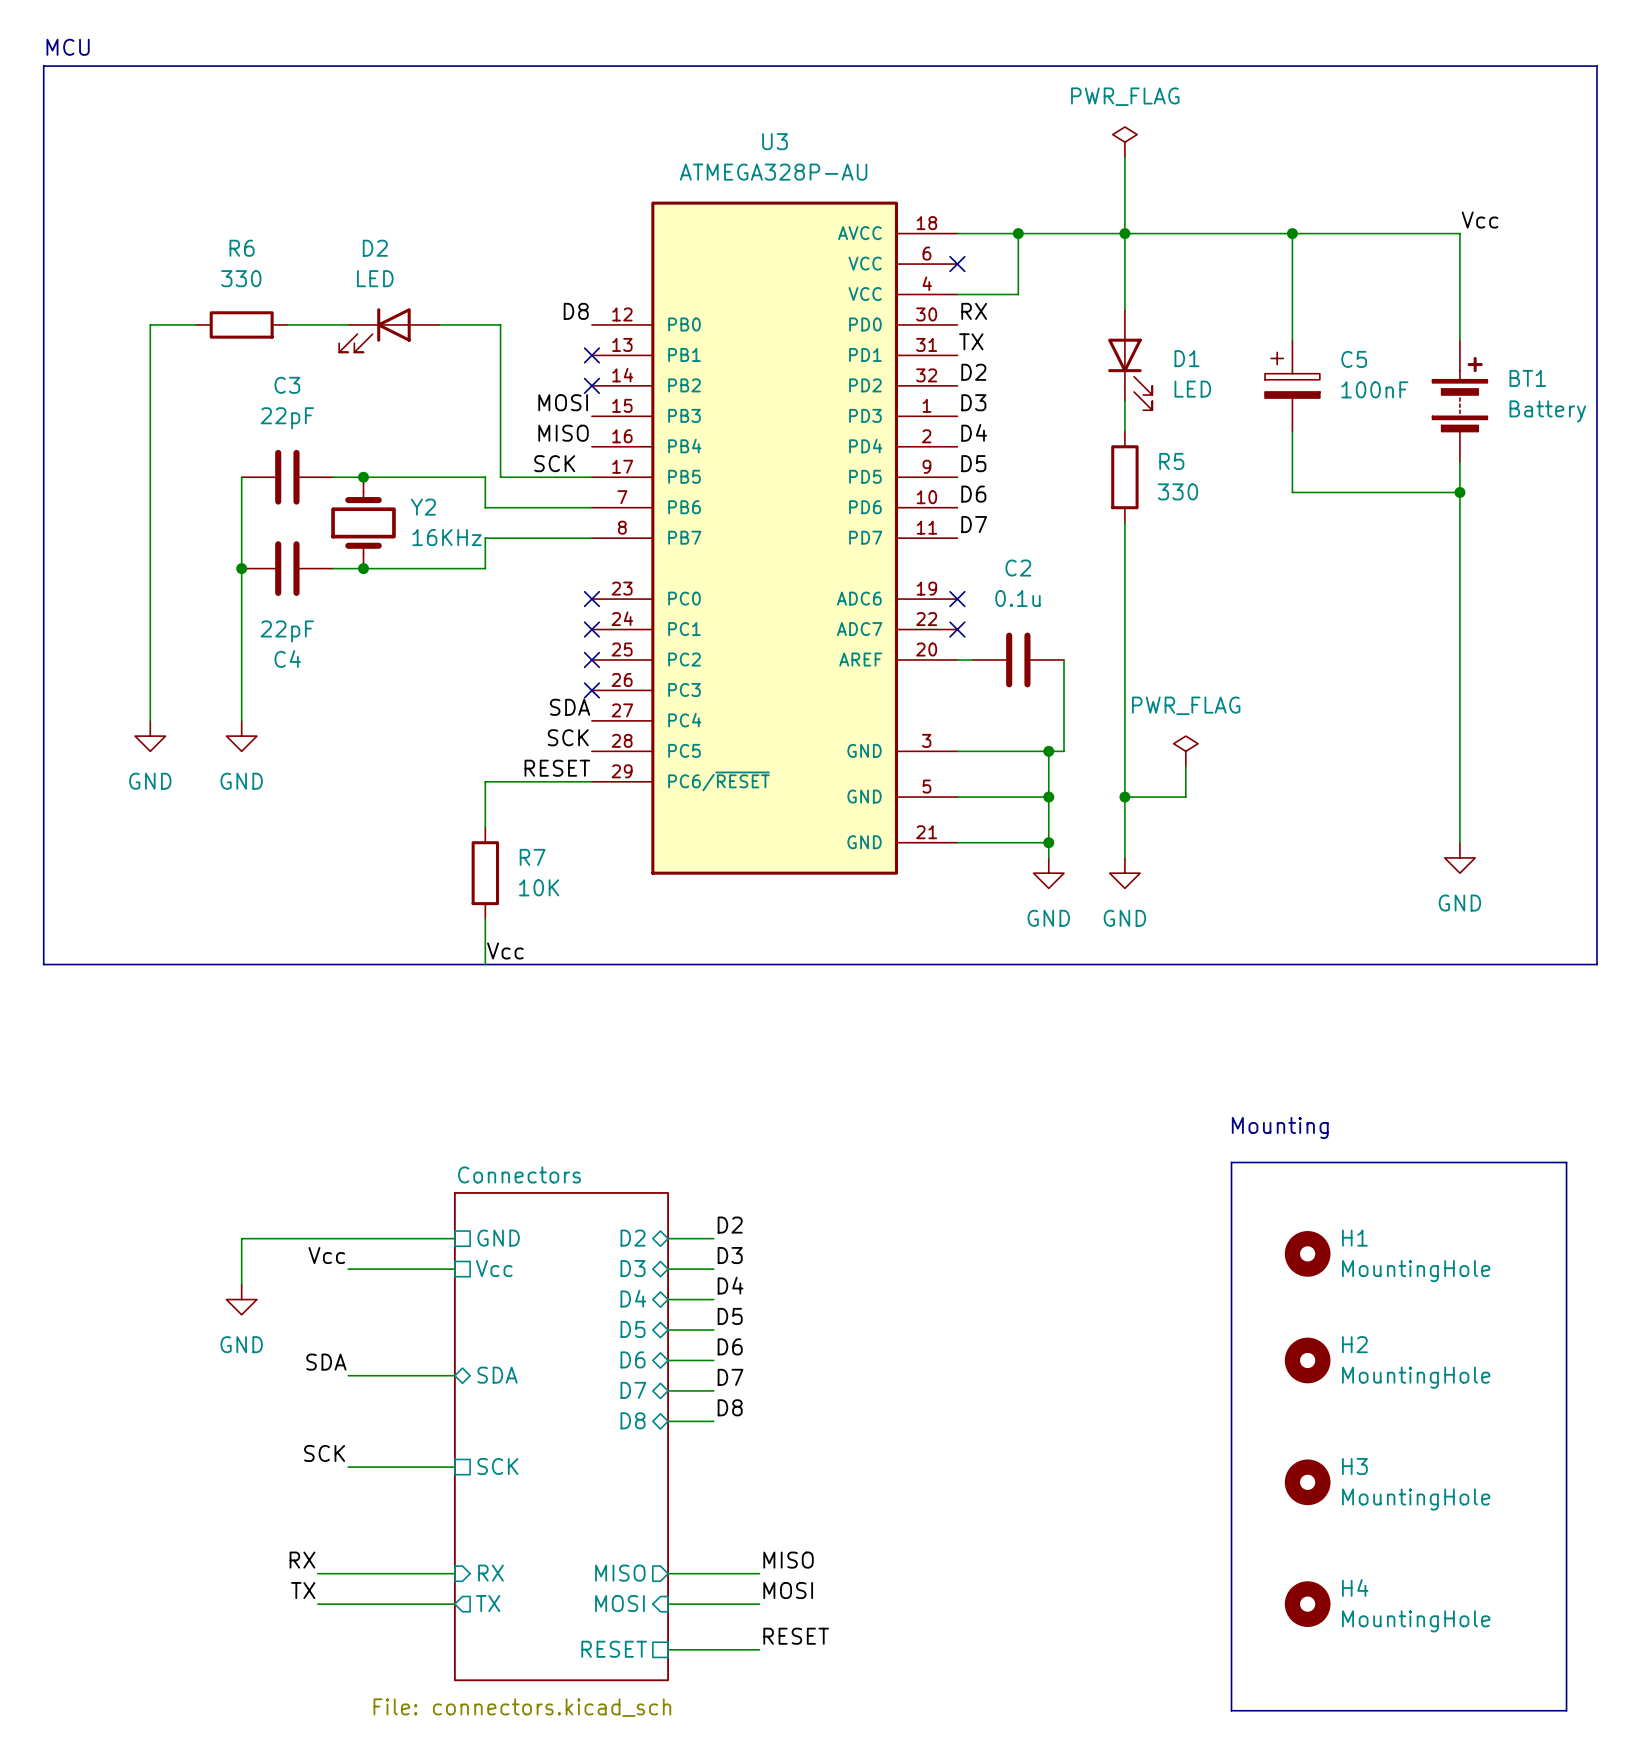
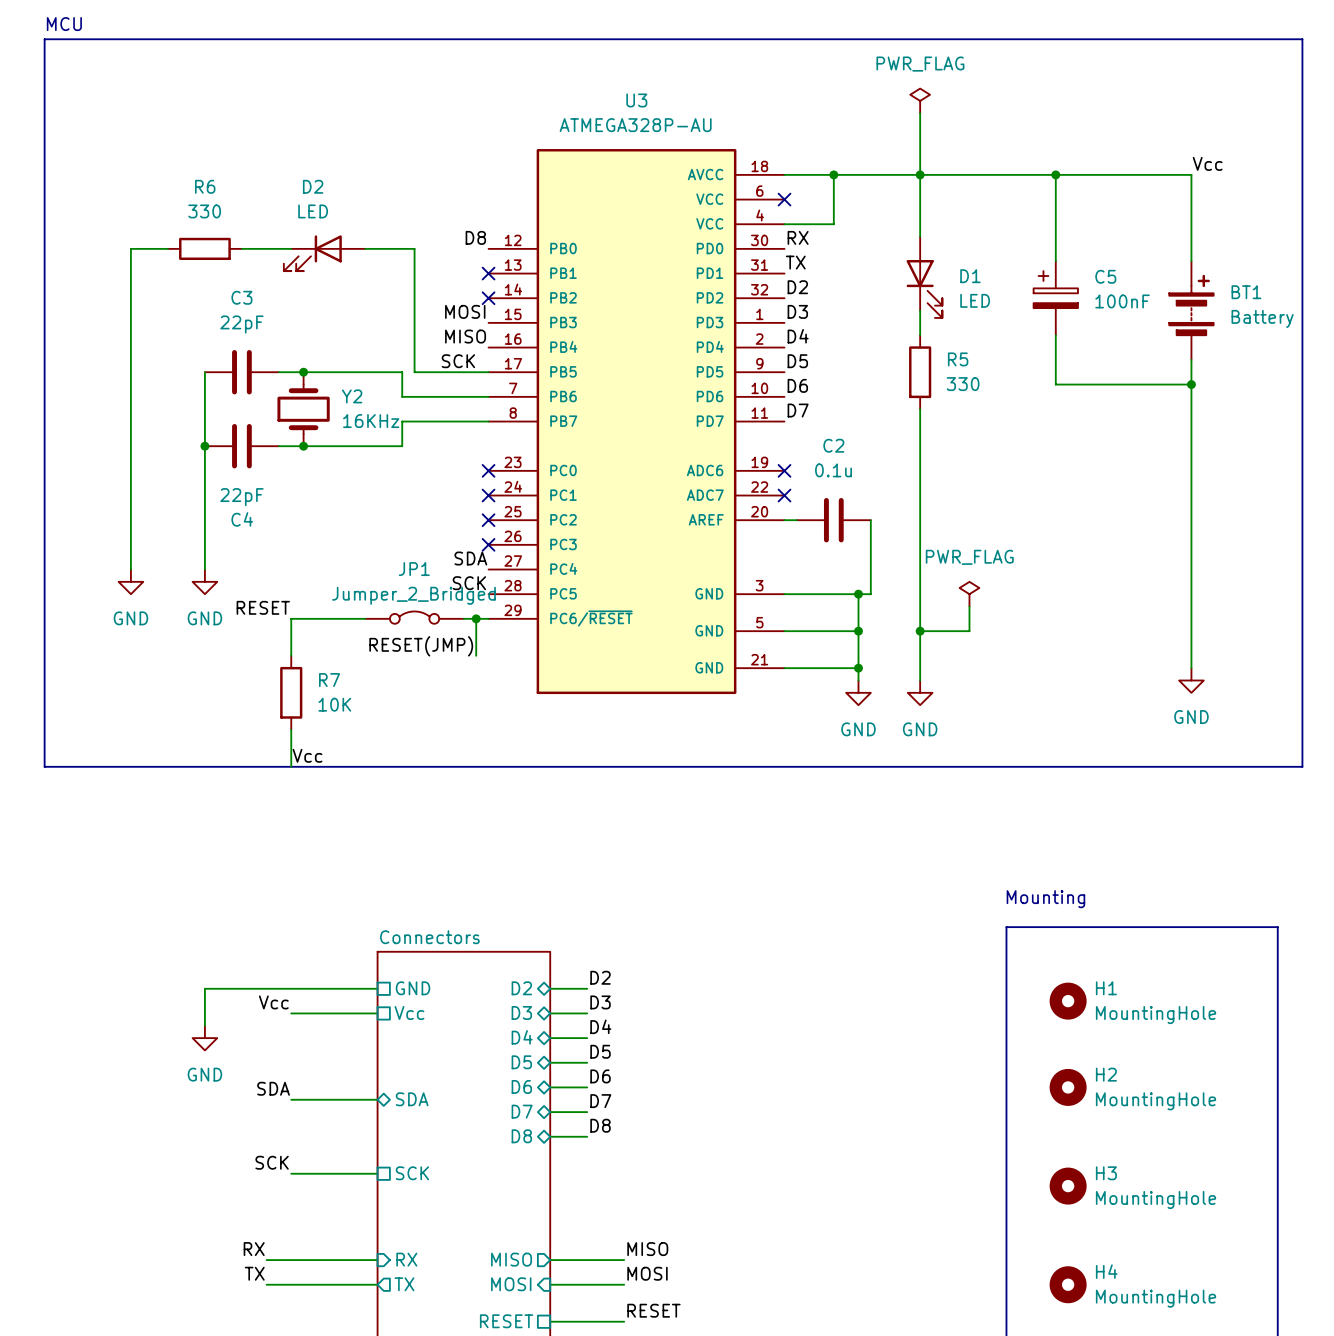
label position: RESET (557, 768) -> RESET (263, 607)
JP1: none -> Jumper_2_Bridged (414, 617)
wire: none -> (365, 618) (291, 618) (291, 655)
wire: (561, 781) (485, 781) (485, 827) -> none
wire: none -> (476, 618) (476, 655)
junction: none -> (476, 618)
label: none -> RESET(JMP) (421, 646)
R7 position: (485, 873) -> (291, 692)
wire: (485, 918) (485, 964) -> (291, 729) (291, 766)
label position: Vcc (505, 950) -> Vcc (307, 755)

